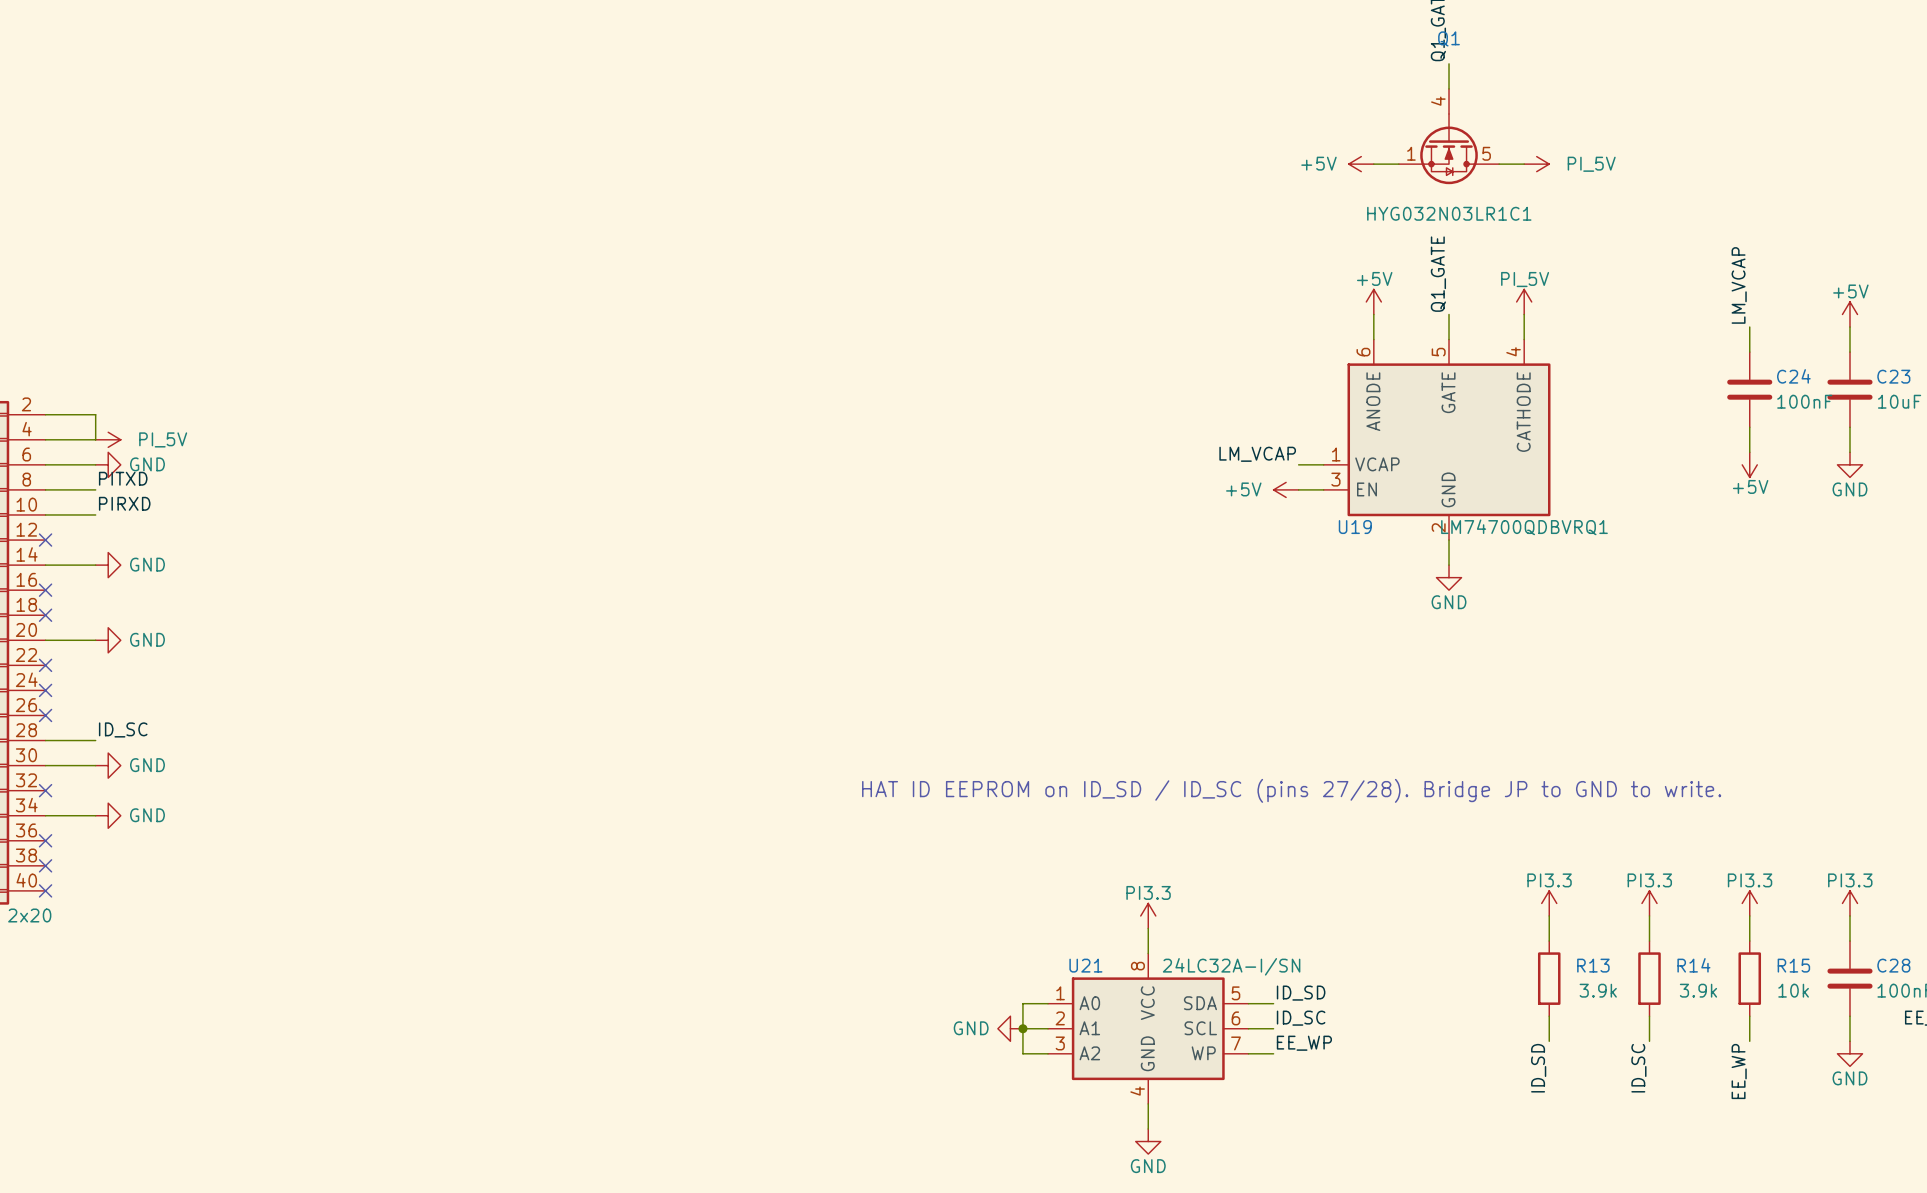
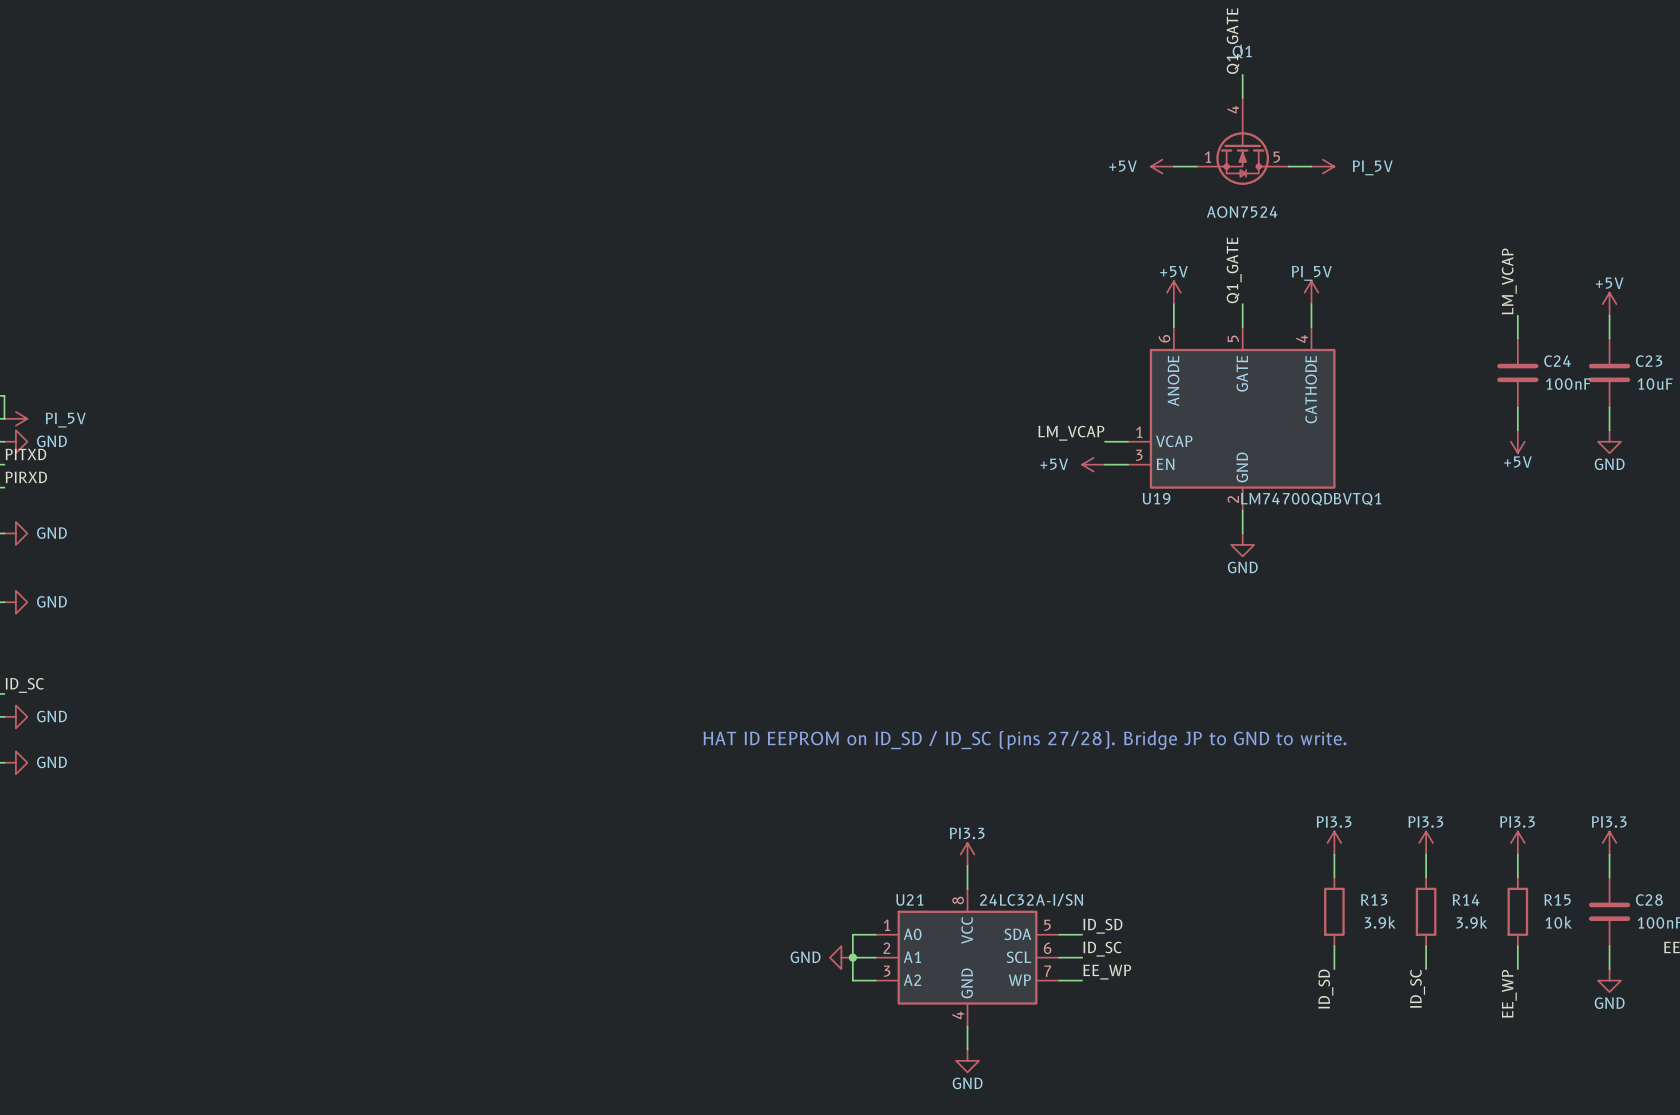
Q1 value: HYG032N03LR1C1 (1449, 213) -> AON7524 (1242, 212)
U19 value: LM74700QDBVRQ1 (1524, 527) -> LM74700QDBVTQ1 (1311, 499)

